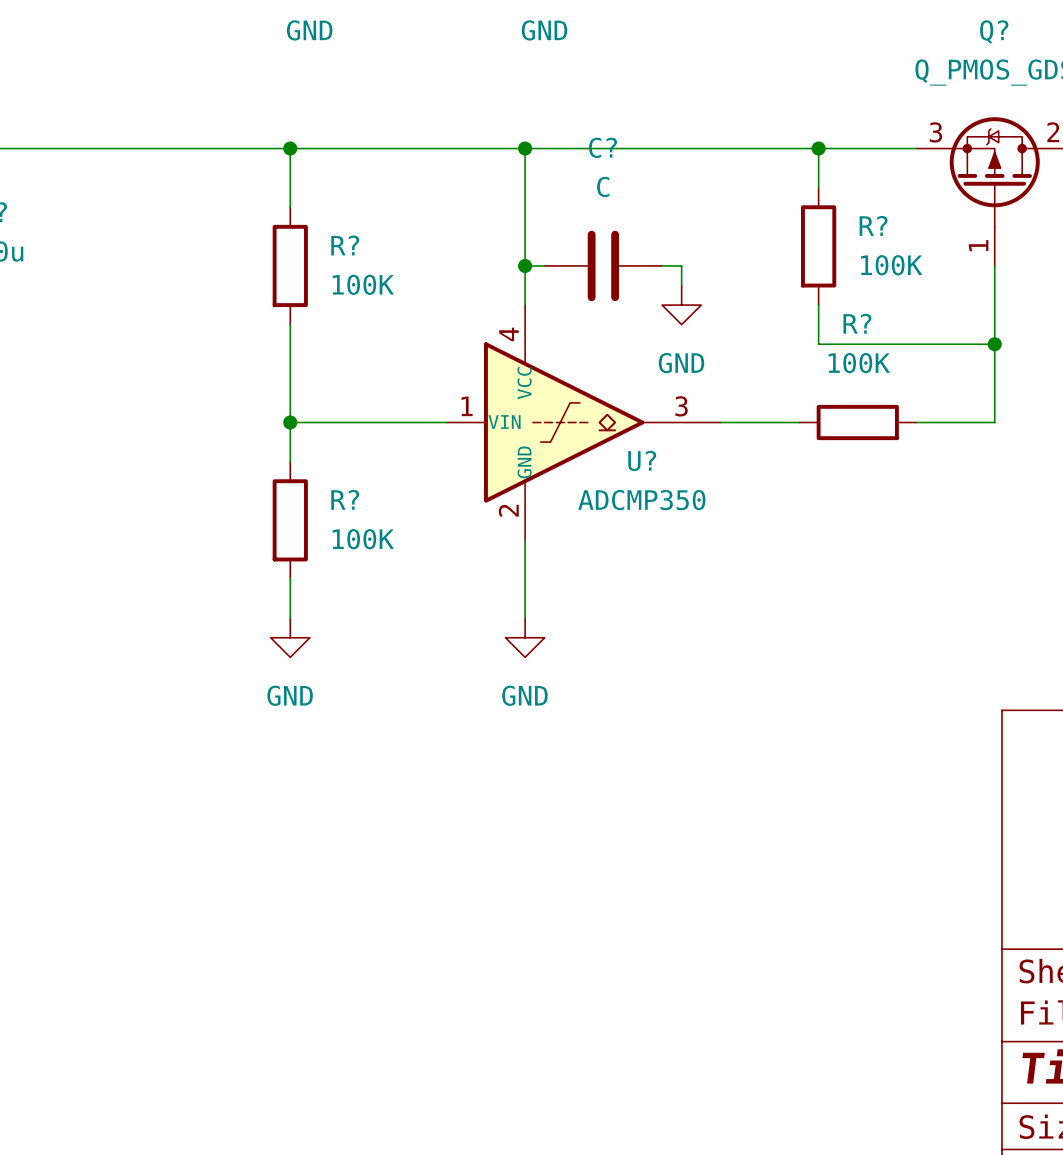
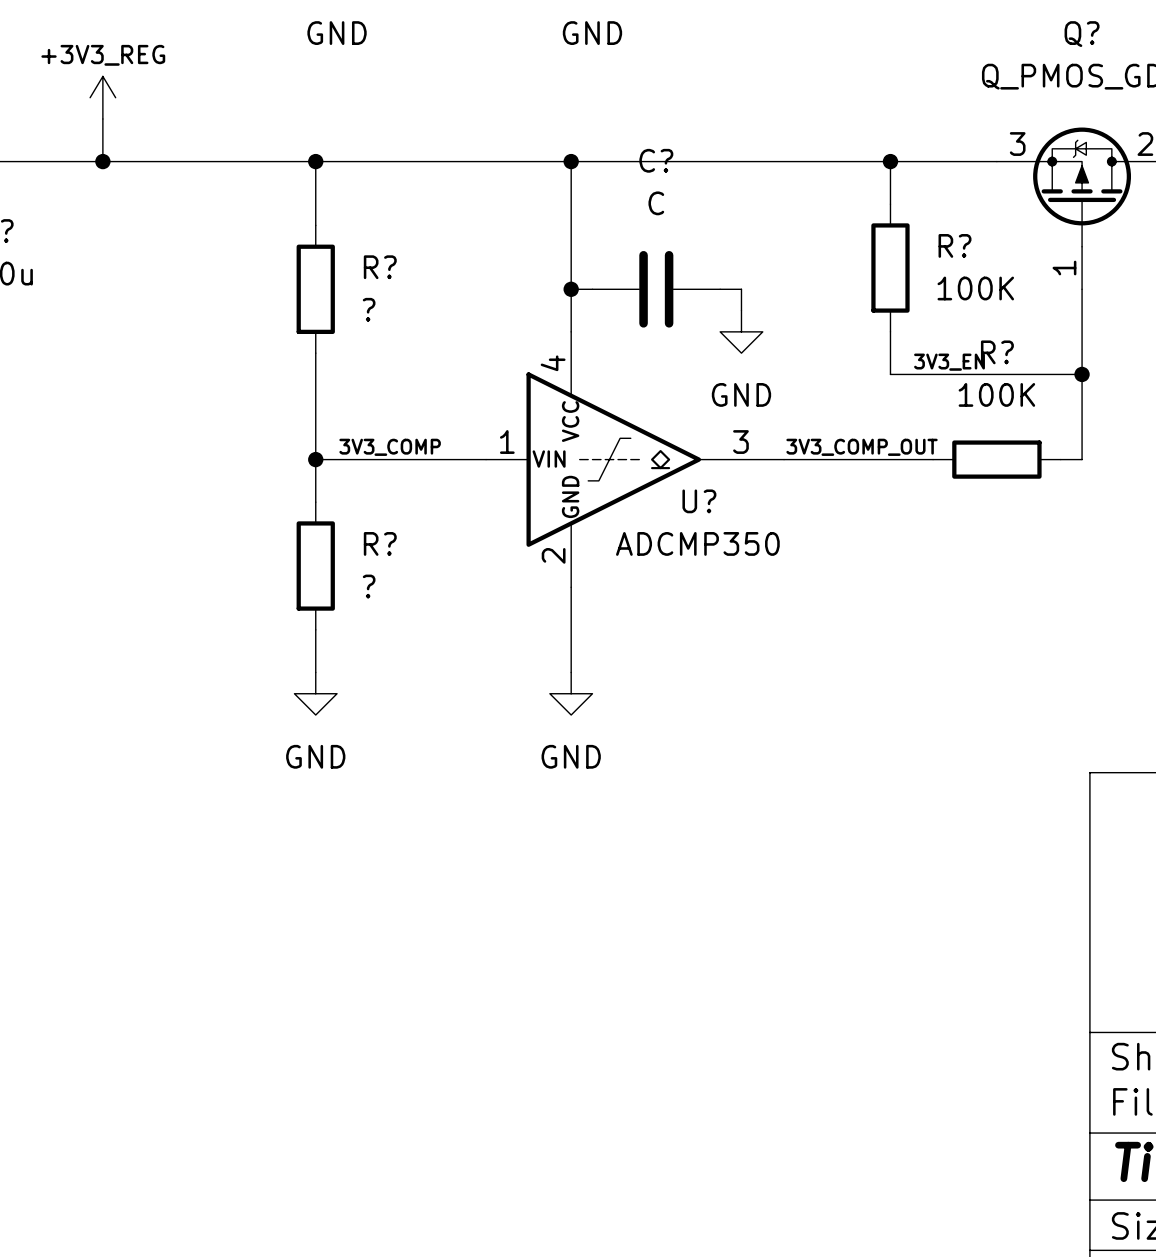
power symbol: none -> +3V3_REG (102, 97)
wire: none -> (102, 119) (102, 161)
junction: none -> (102, 161)
R? value: 100K (363, 284) -> ? (369, 309)
label: none -> 3V3_EN (949, 362)
label: none -> 3V3_COMP (390, 447)
label: none -> 3V3_COMP_OUT (862, 447)
R? position: (857, 422) -> (996, 459)
wire: (916, 422) (975, 422) -> (869, 459) (933, 459)
R? value: 100K (363, 539) -> ? (369, 586)

